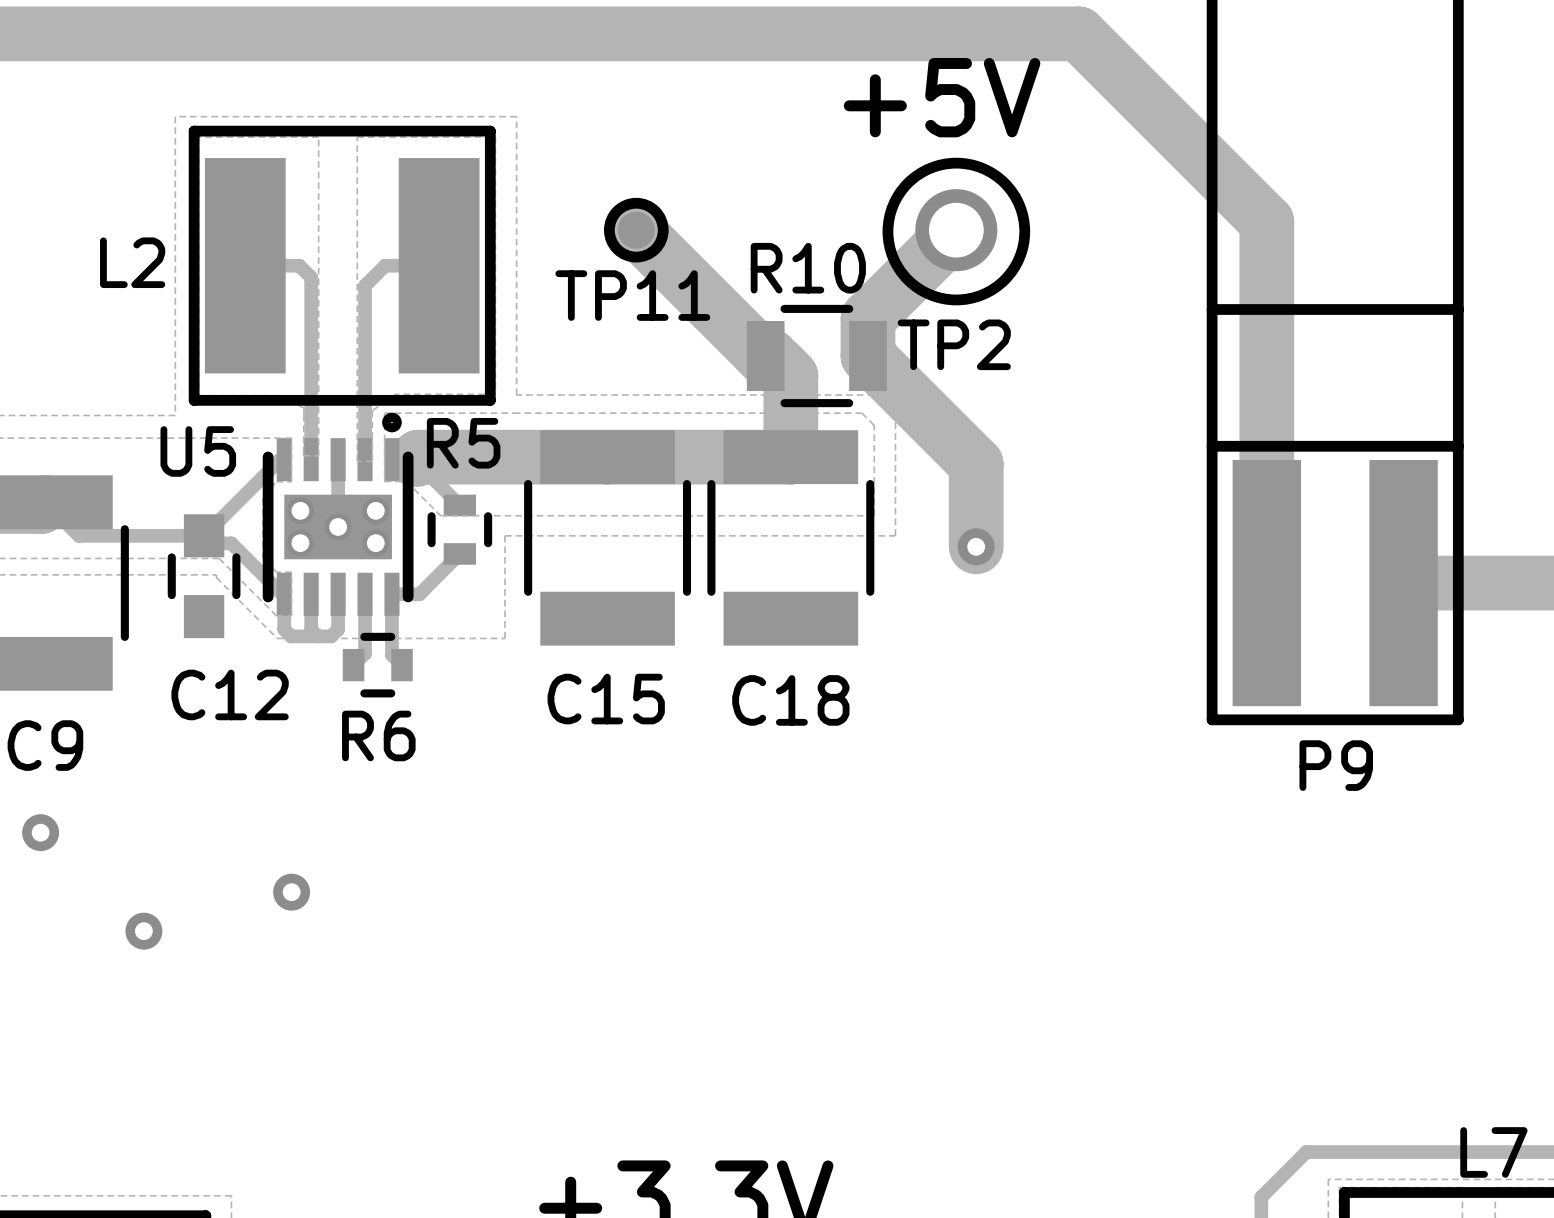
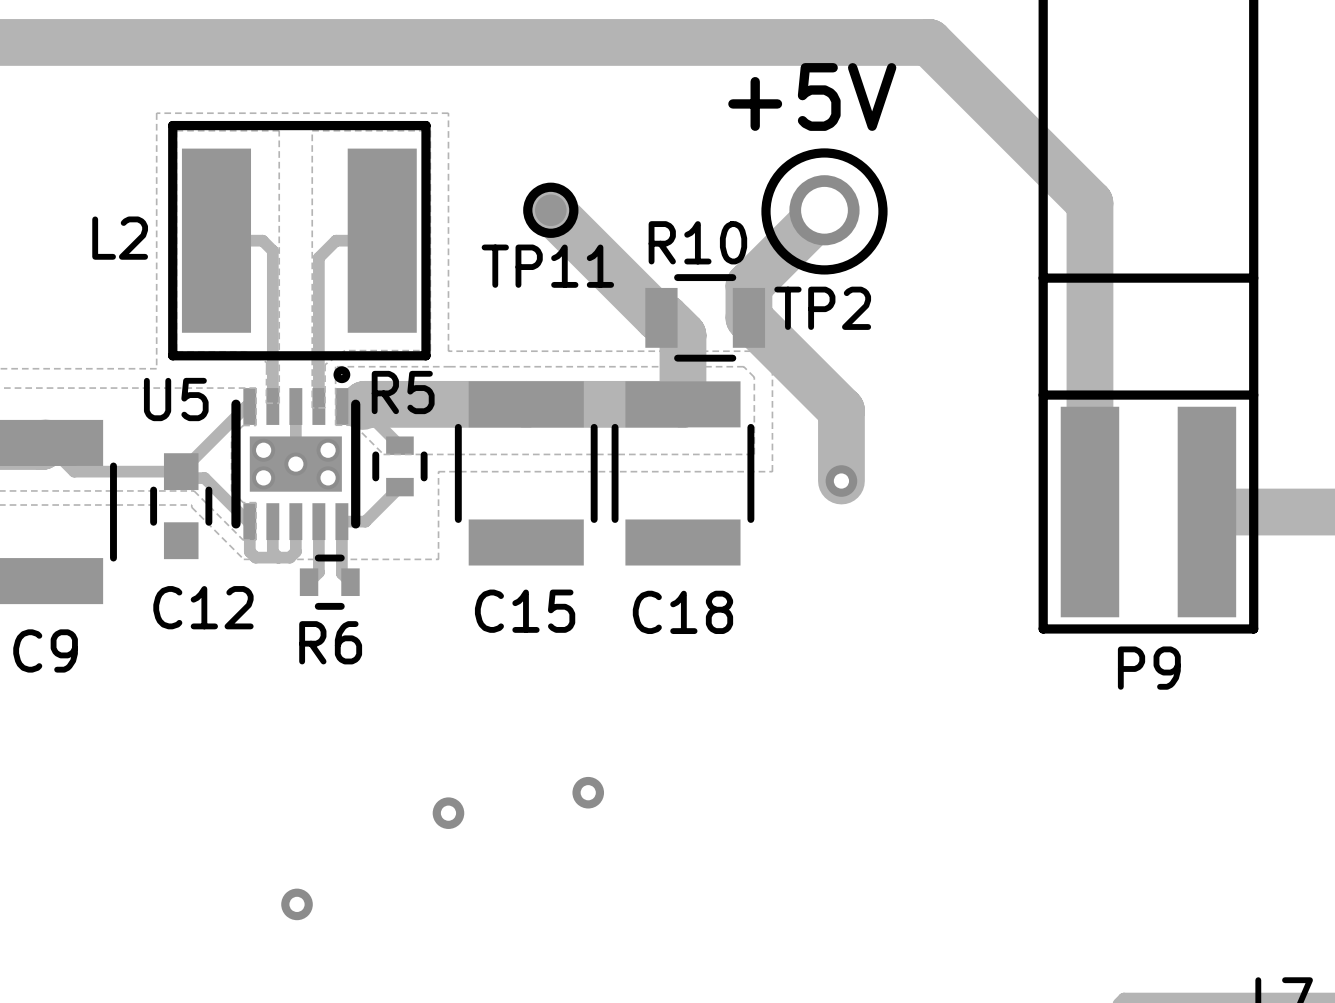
part: (40, 832) -> none
part: (291, 892) -> none
part: none -> (588, 792)
part: (143, 931) -> none
part: none -> (448, 813)
part: none -> (297, 904)

